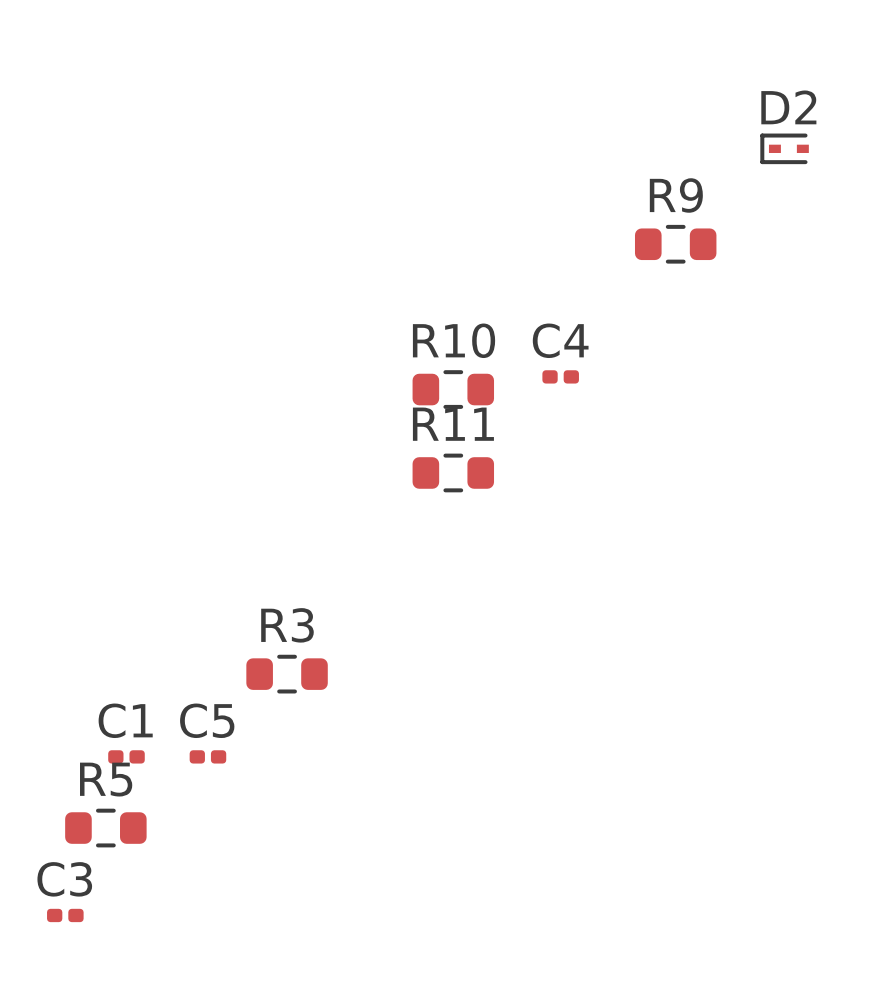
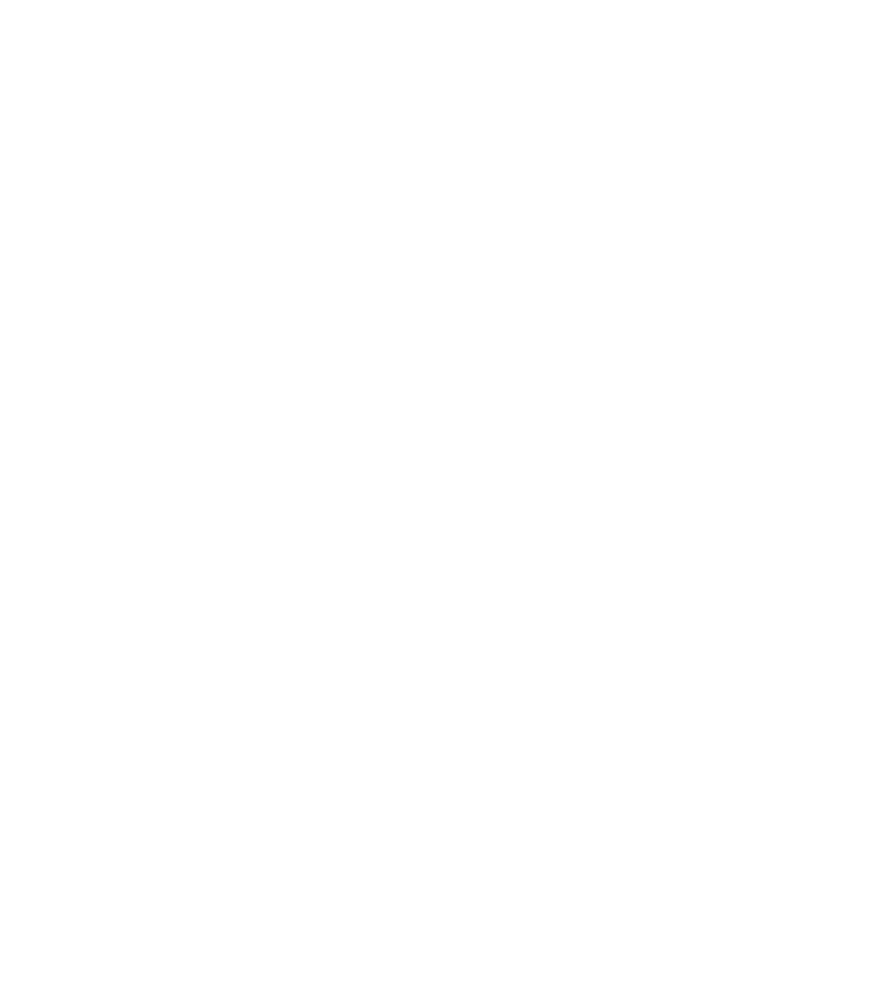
D2: (784, 148) -> none
R9: (675, 244) -> none
C4: (560, 376) -> none
R10: (453, 389) -> none
R11: (453, 472) -> none
R3: (287, 674) -> none
C1: (126, 756) -> none
C5: (207, 756) -> none
R5: (105, 828) -> none
C3: (65, 915) -> none

